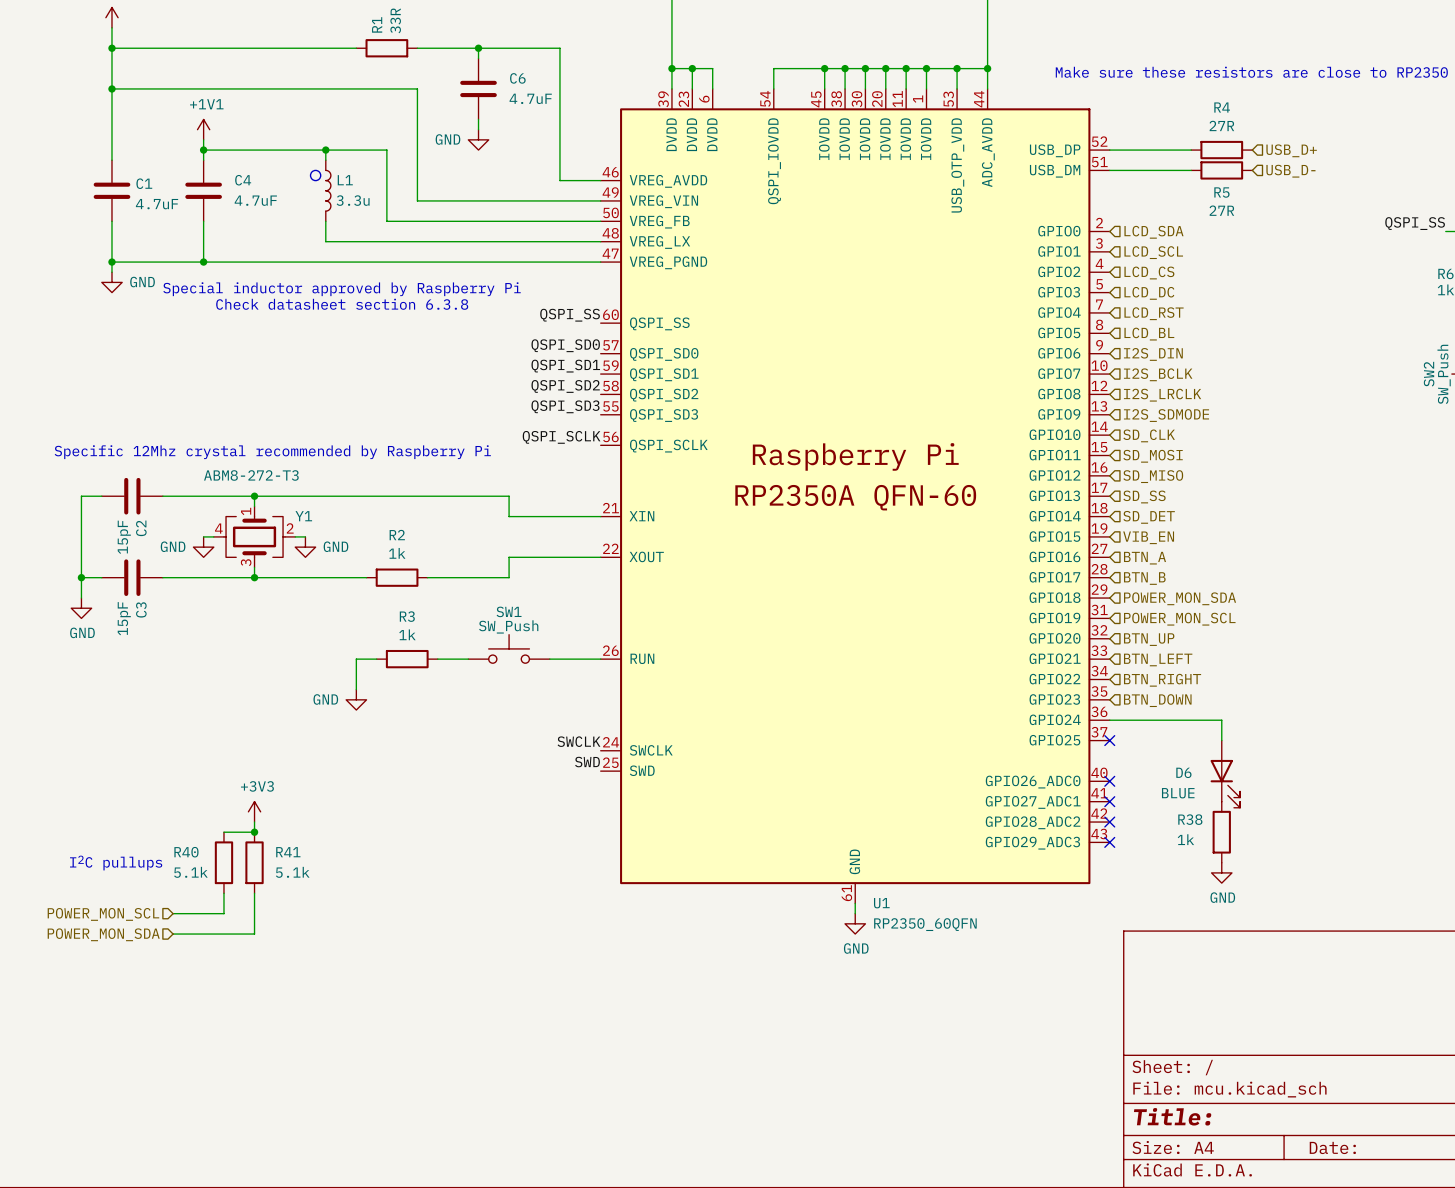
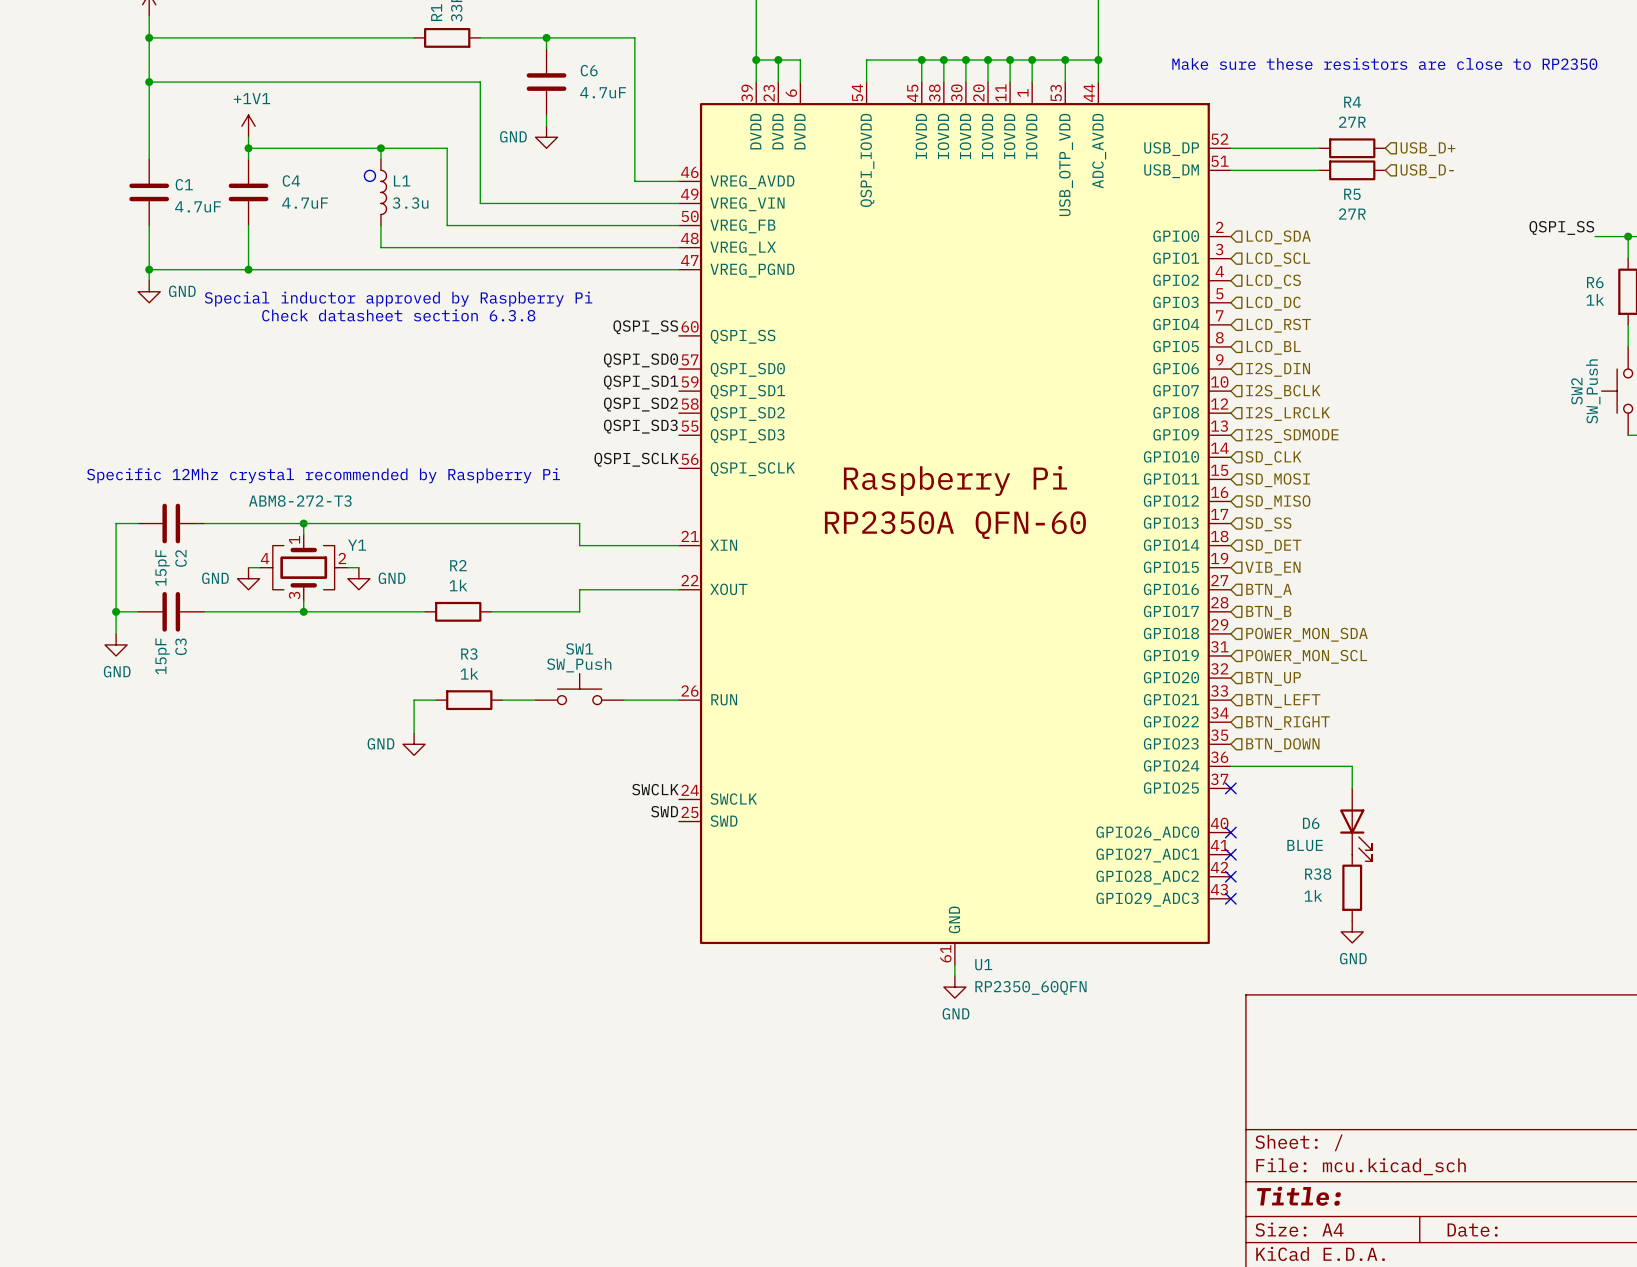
power symbol: +3V3 (254, 811) -> none
wire: (254, 822) (254, 832) (223, 832) -> none
junction: (254, 832) -> none
R40: 5.1k (223, 862) -> none
R41: 5.1k (254, 862) -> none
text: I2C pullups (116, 863) -> none
wire: (223, 893) (223, 913) (173, 913) -> none
wire: (254, 893) (254, 934) (173, 934) -> none
hierarchical label: POWER_MON_SCL (103, 914) -> none
hierarchical label: POWER_MON_SDA (103, 934) -> none

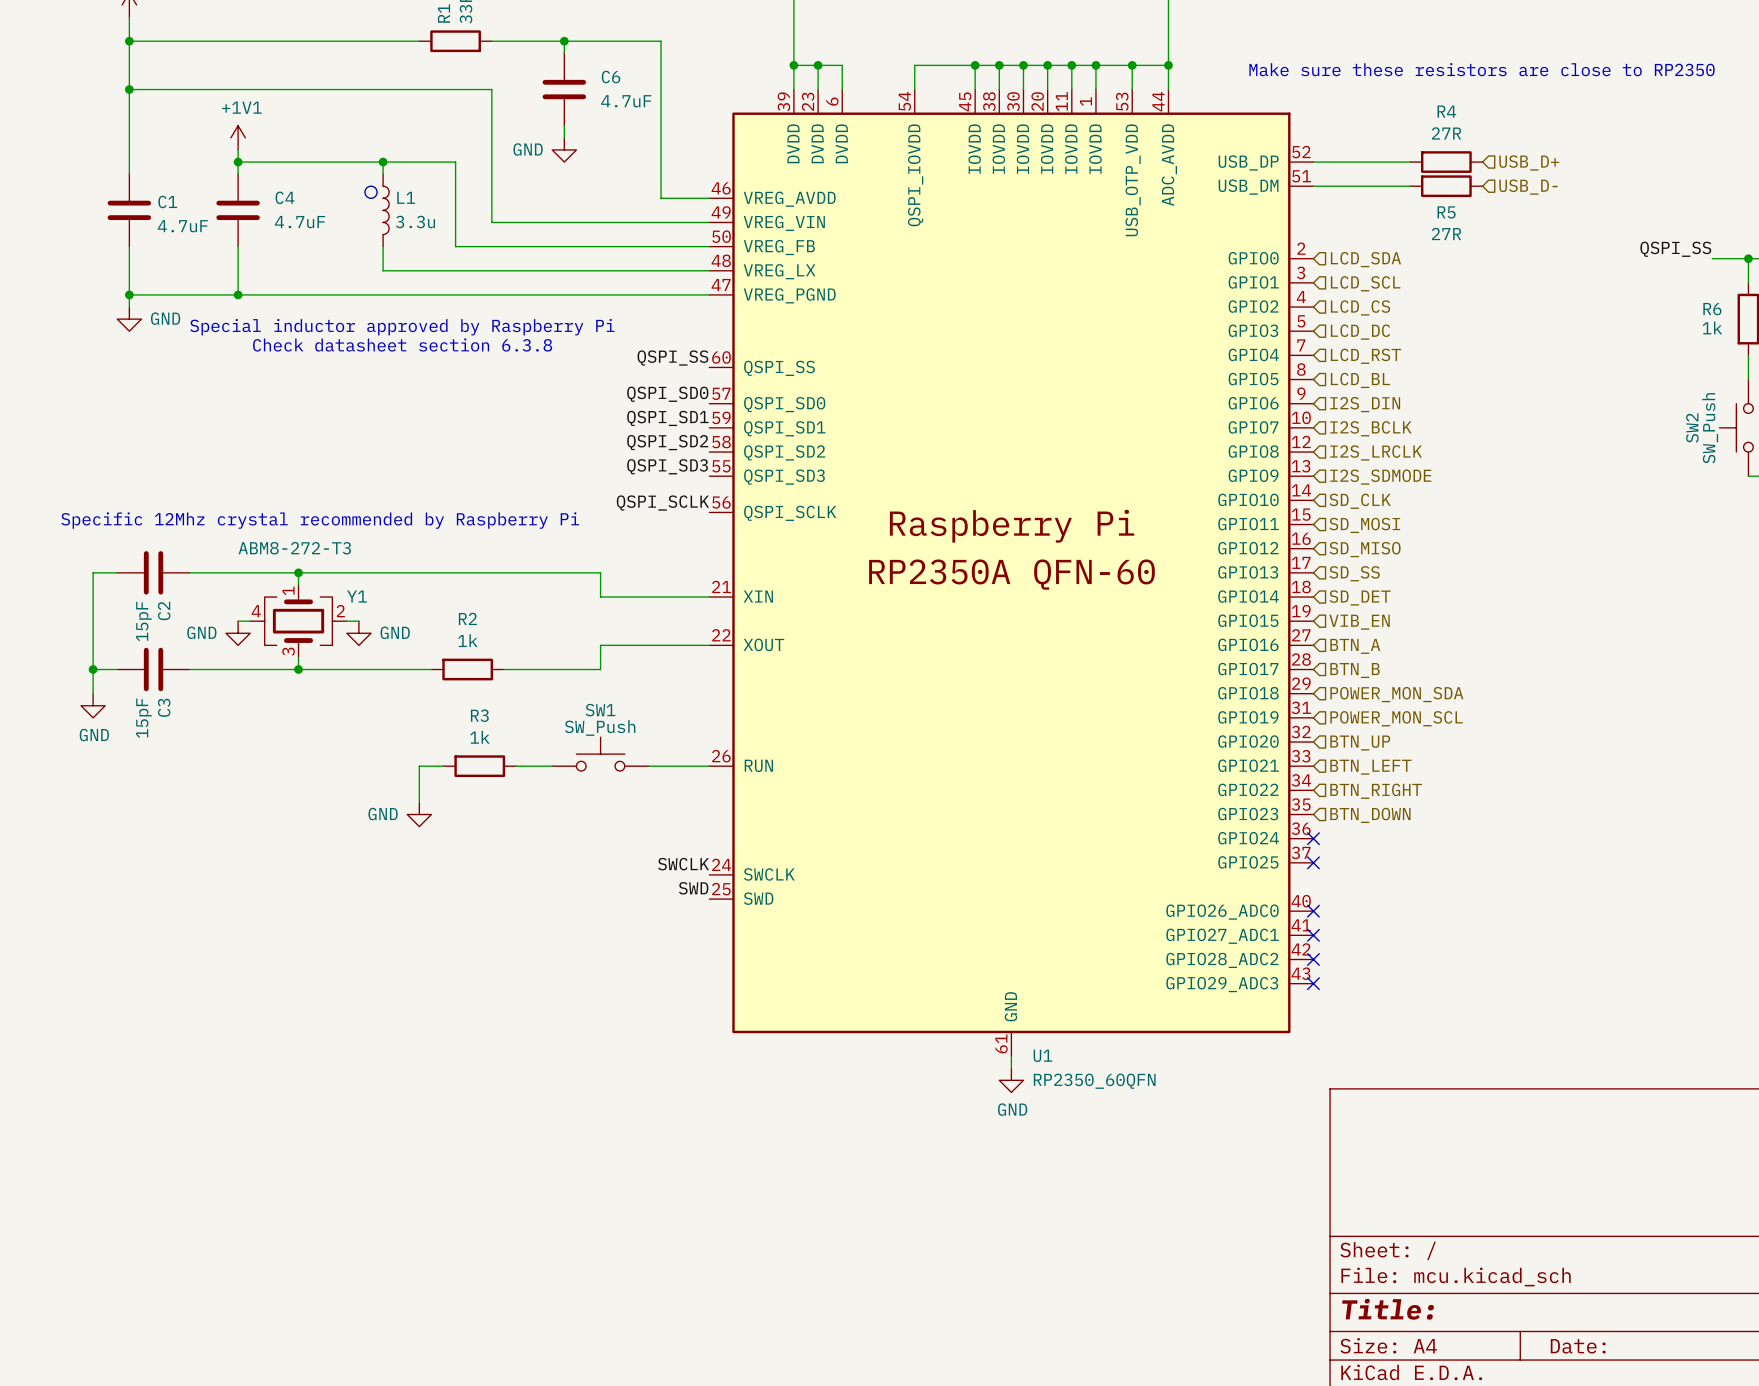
wire: (1230, 766) (1352, 766) (1352, 788) -> none
no-connect mark: none -> (1313, 838)
D6: BLUE (1356, 824) -> none
R38: 1k (1352, 887) -> none
power symbol: GND (1352, 931) -> none

